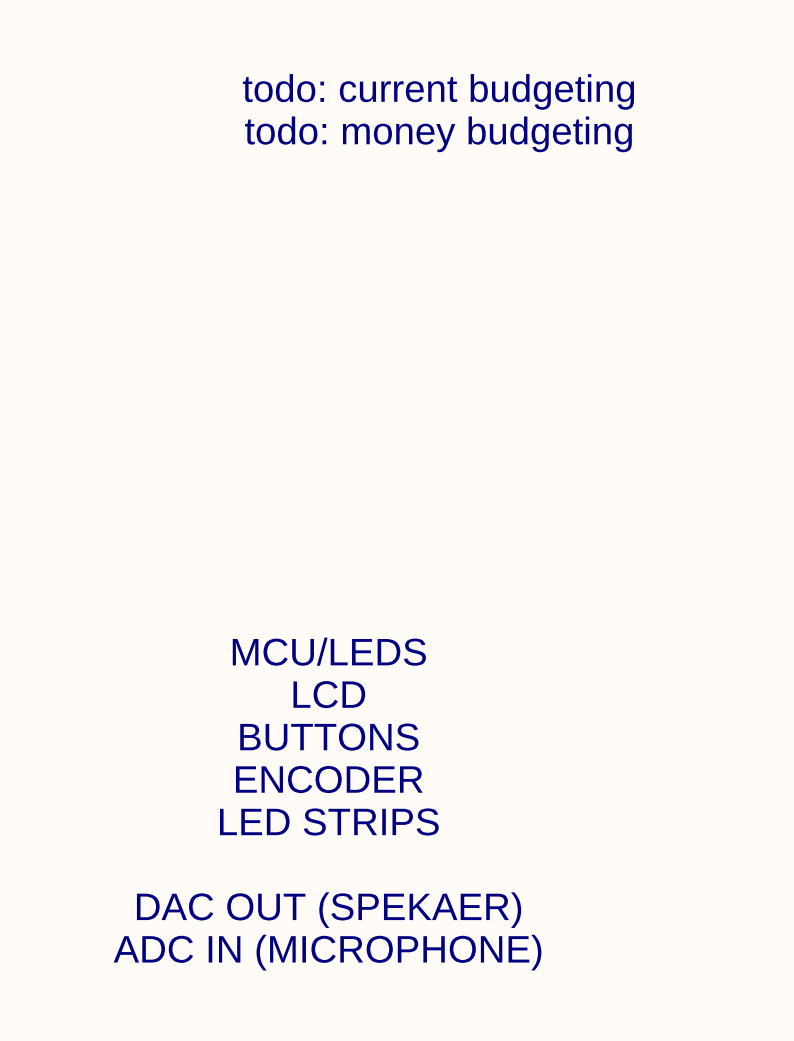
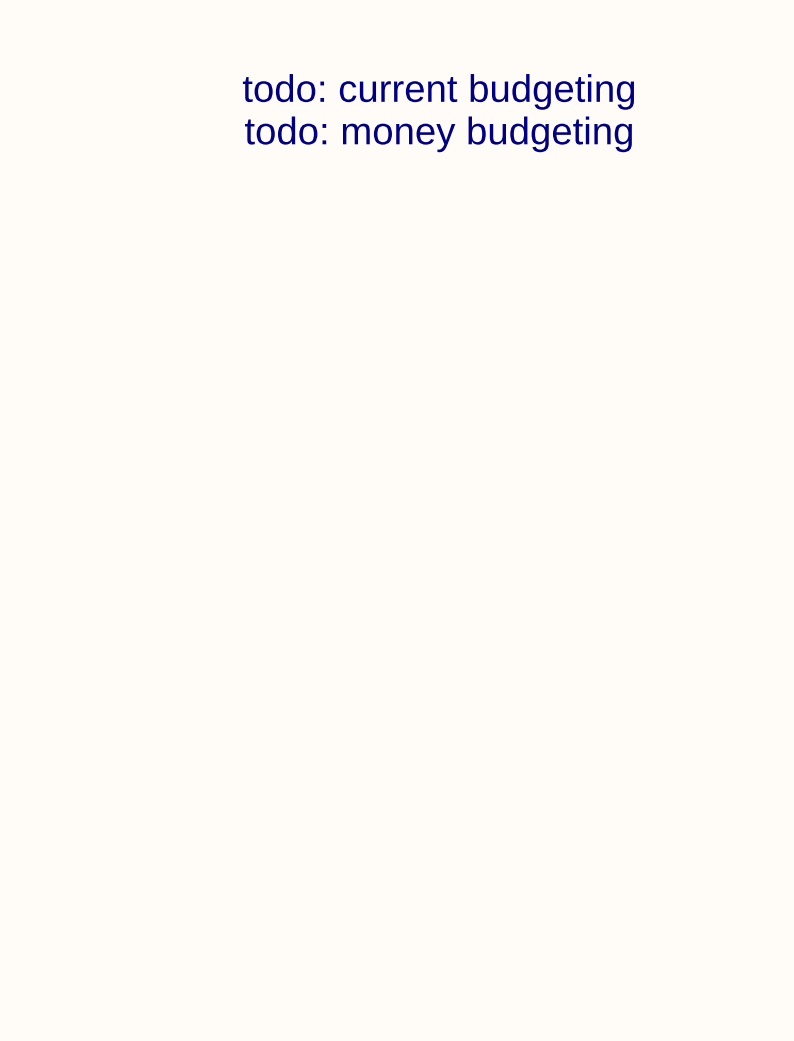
text: MCU/LEDS (329, 651) -> none
text: LCD (329, 694) -> none
text: BUTTONS (329, 737) -> none
text: ENCODER (329, 779) -> none
text: LED STRIPS (329, 821) -> none
text: DAC OUT (SPEKAER) (329, 910) -> none
text: ADC IN (MICROPHONE) (327, 952) -> none

